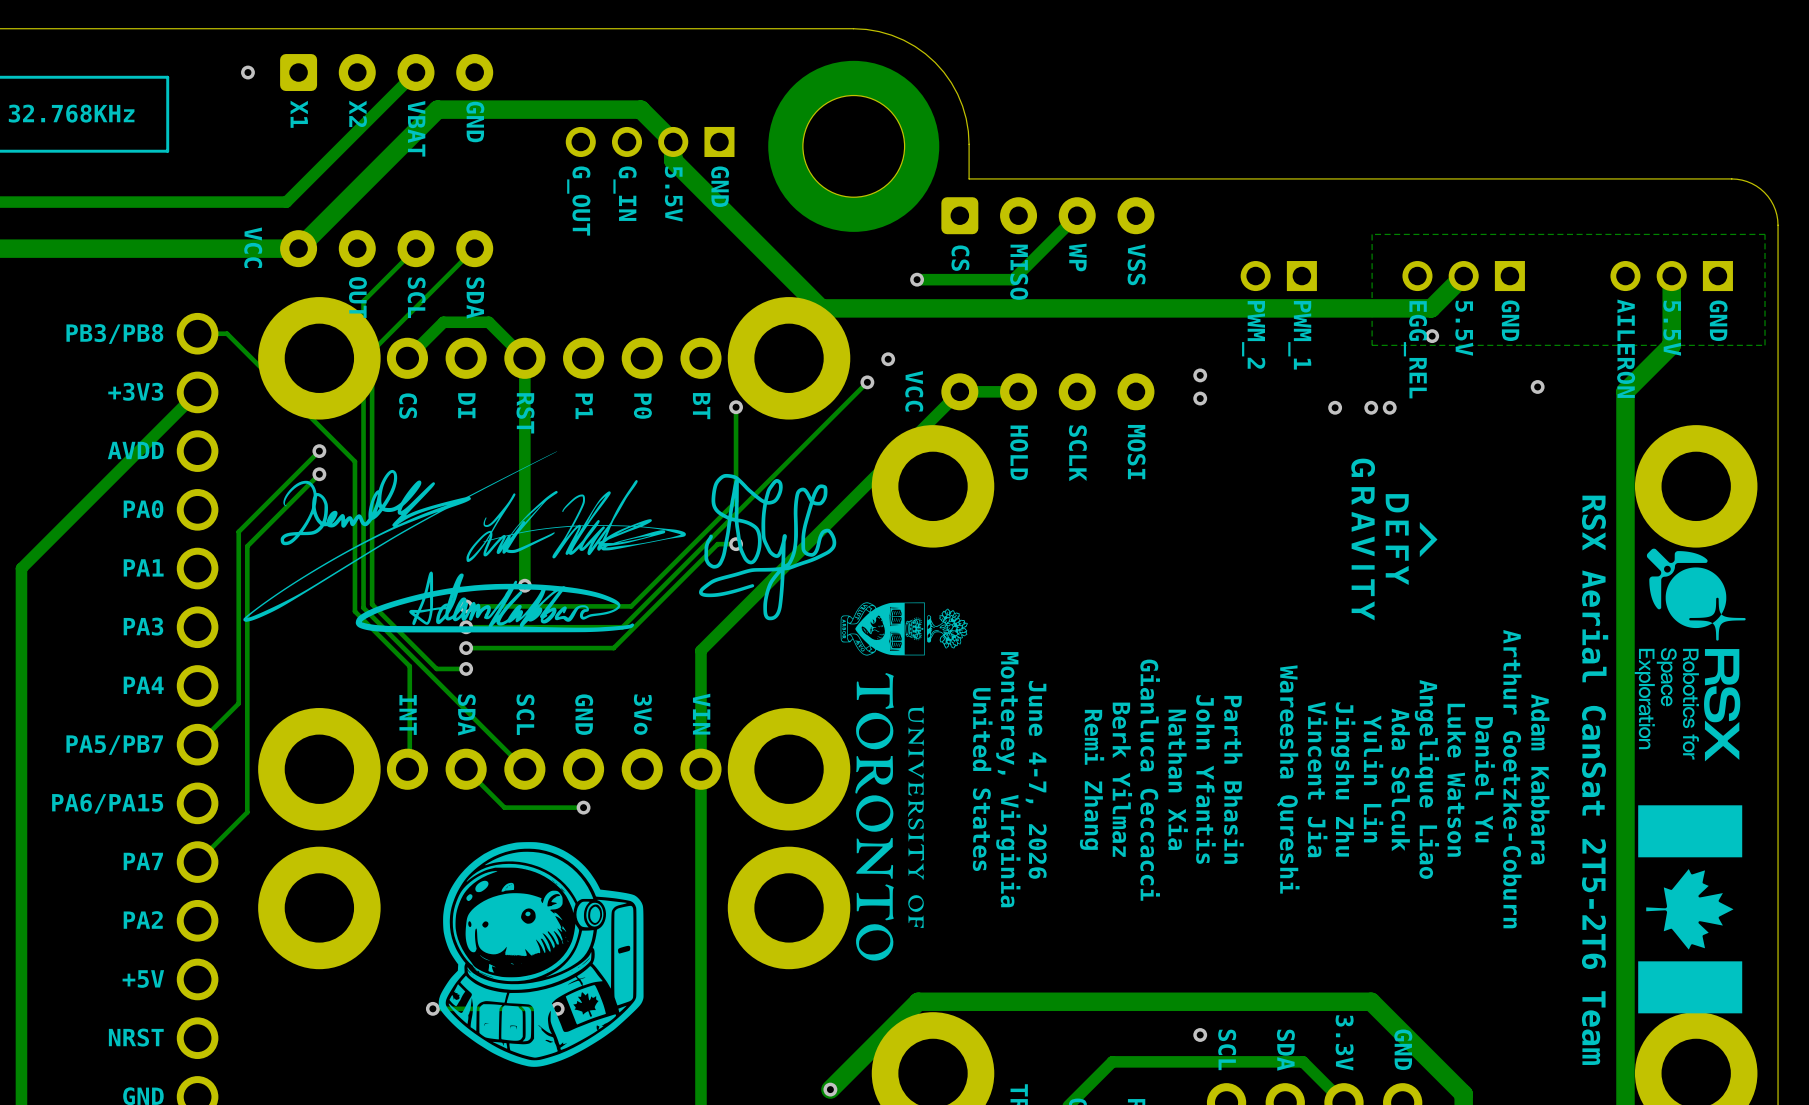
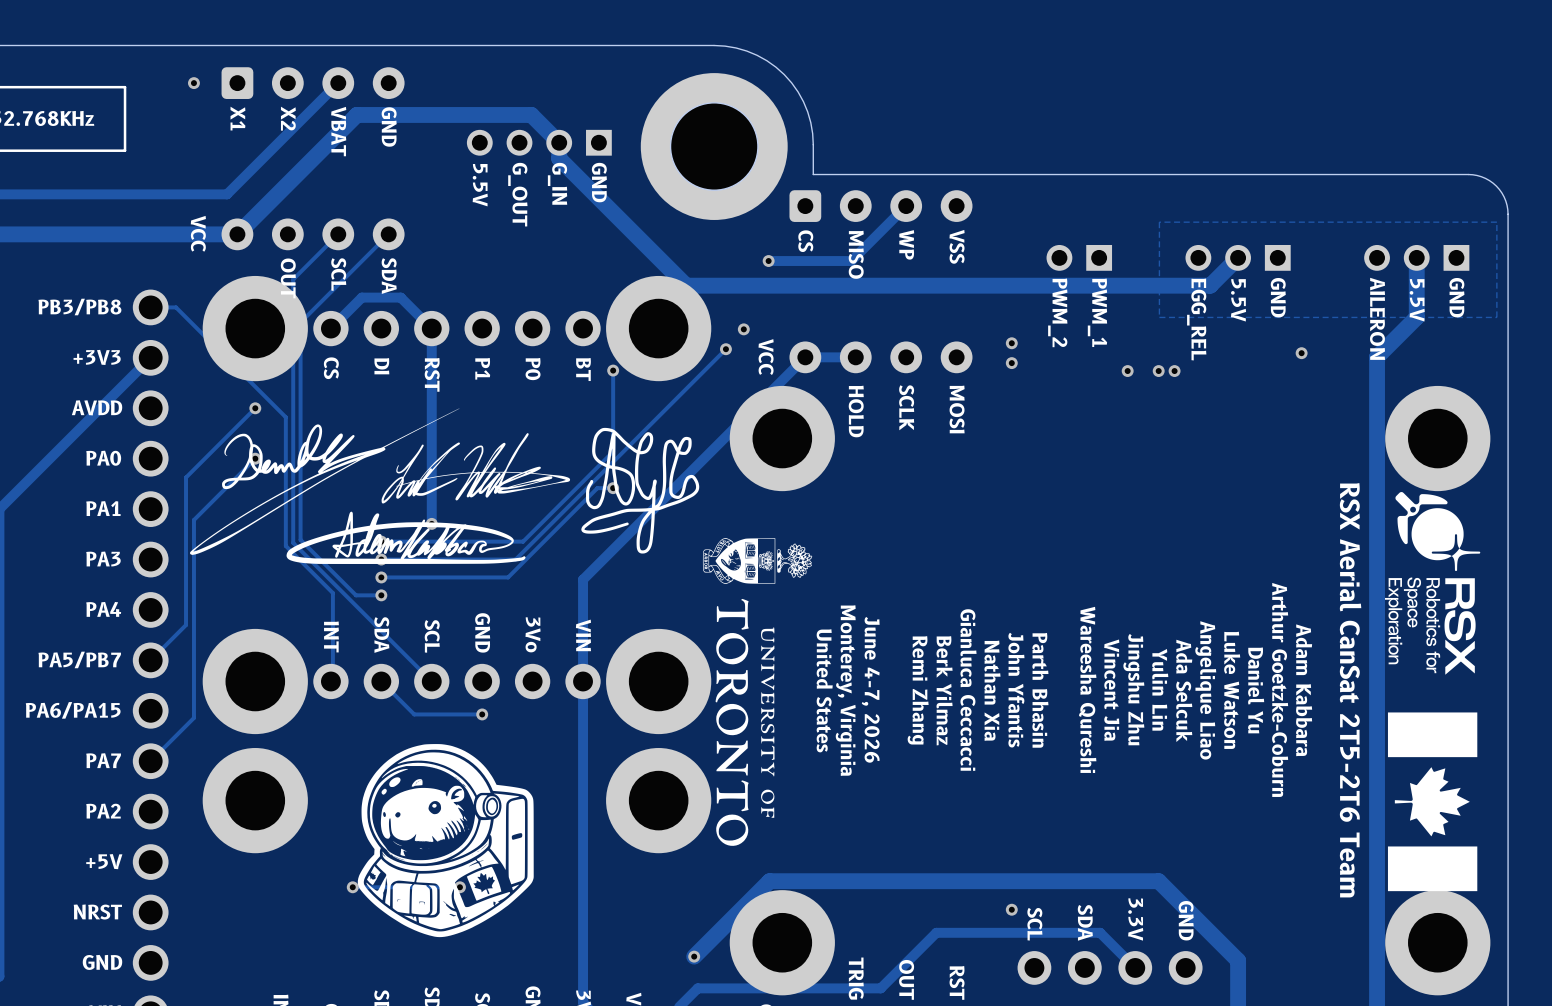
text: G_IN (625, 193) -> G_OUT (517, 194)
text: 5.5V (673, 194) -> G_IN (557, 183)
text: G_OUT (578, 201) -> 5.5V (480, 185)
via: (1432, 336) -> none
drawing: [1351, 458, 1438, 621] -> none
track: (319, 474) (247, 546) (247, 812) -> (255, 458) (193, 520) (193, 718)
via position: (319, 474) -> (255, 458)

